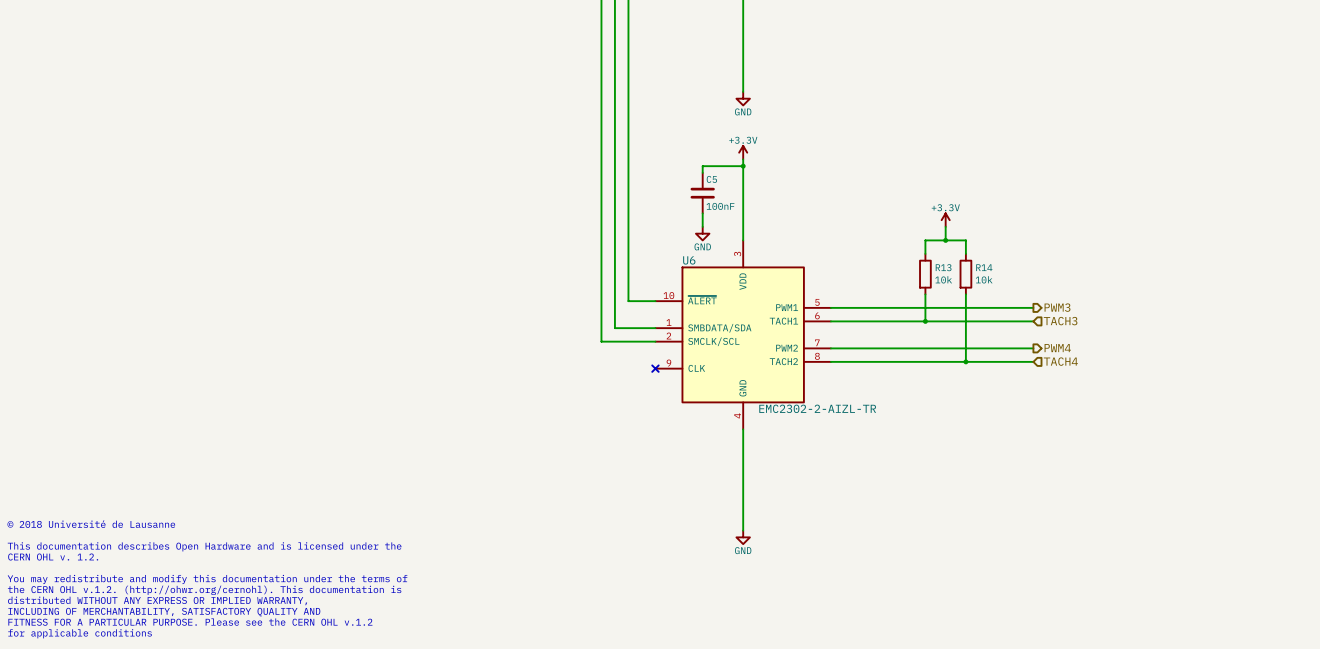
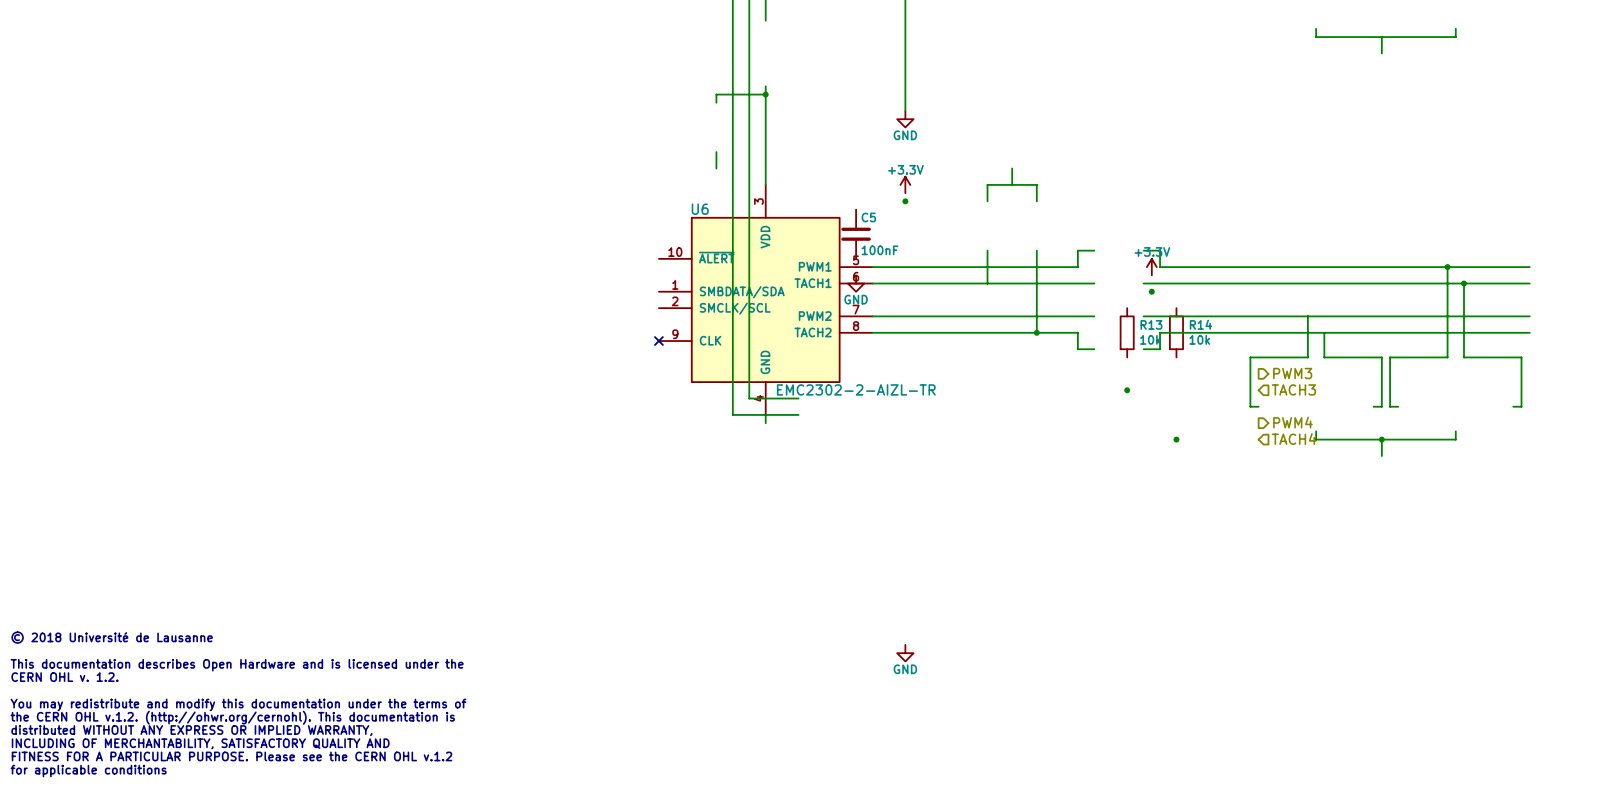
wire: (628, 17) (628, 71) -> none
wire: none -> (1316, 28) (1316, 37) (1455, 37) (1455, 28)
wire: none -> (1381, 37) (1381, 53)
wire: none -> (765, 94) (716, 94) (716, 102)
junction: none -> (765, 94)
wire: none -> (716, 152) (716, 168)
wire: none -> (1012, 168) (1012, 184)
wire: (743, 159) (743, 240) -> none
wire: (743, 166) (702, 166) (702, 172) -> none
wire: none -> (987, 201) (987, 184) (1036, 184) (1036, 201)
wire: none -> (987, 250) (987, 283)
wire: none -> (1036, 250) (1036, 332)
wire: none -> (1094, 250) (1077, 250) (1077, 267) (872, 267)
wire: none -> (1143, 250) (1160, 250) (1160, 267) (1529, 267)
wire: (702, 213) (702, 226) -> none
wire: none -> (1447, 267) (1447, 357) (1390, 357) (1390, 406) (1398, 406)
junction: none -> (1447, 267)
wire: (945, 226) (945, 240) -> none
wire: none -> (872, 283) (1094, 283)
wire: none -> (1143, 283) (1529, 283)
wire: none -> (1463, 283) (1463, 357) (1521, 357) (1521, 406) (1513, 406)
junction: none -> (1463, 283)
wire: (925, 253) (925, 240) (965, 240) (965, 253) -> none
wire: none -> (872, 316) (1094, 316)
wire: none -> (1143, 316) (1529, 316)
wire: none -> (1307, 316) (1307, 357) (1250, 357) (1250, 406) (1258, 406)
wire: none -> (872, 332) (1077, 332) (1077, 349) (1094, 349)
junction: none -> (1036, 332)
wire: none -> (1324, 332) (1324, 357) (1381, 357) (1381, 406) (1373, 406)
wire: none -> (1529, 332) (1160, 332) (1160, 349) (1143, 349)
no-connect mark: none -> (658, 341)
wire: (925, 294) (925, 321) -> none
wire: (965, 294) (965, 361) -> none
wire: (830, 307) (1033, 307) -> none
wire: (830, 321) (1033, 321) -> none
U6 position: (743, 334) -> (765, 299)
wire: none -> (765, 414) (765, 423)
wire: (830, 348) (1033, 348) -> none
wire: none -> (1316, 431) (1316, 439) (1455, 439) (1455, 431)
wire: (830, 361) (1033, 361) -> none
wire: none -> (1381, 439) (1381, 456)
junction: none -> (1381, 439)
no-connect mark: (655, 368) -> none
wire: (743, 429) (743, 530) -> none

